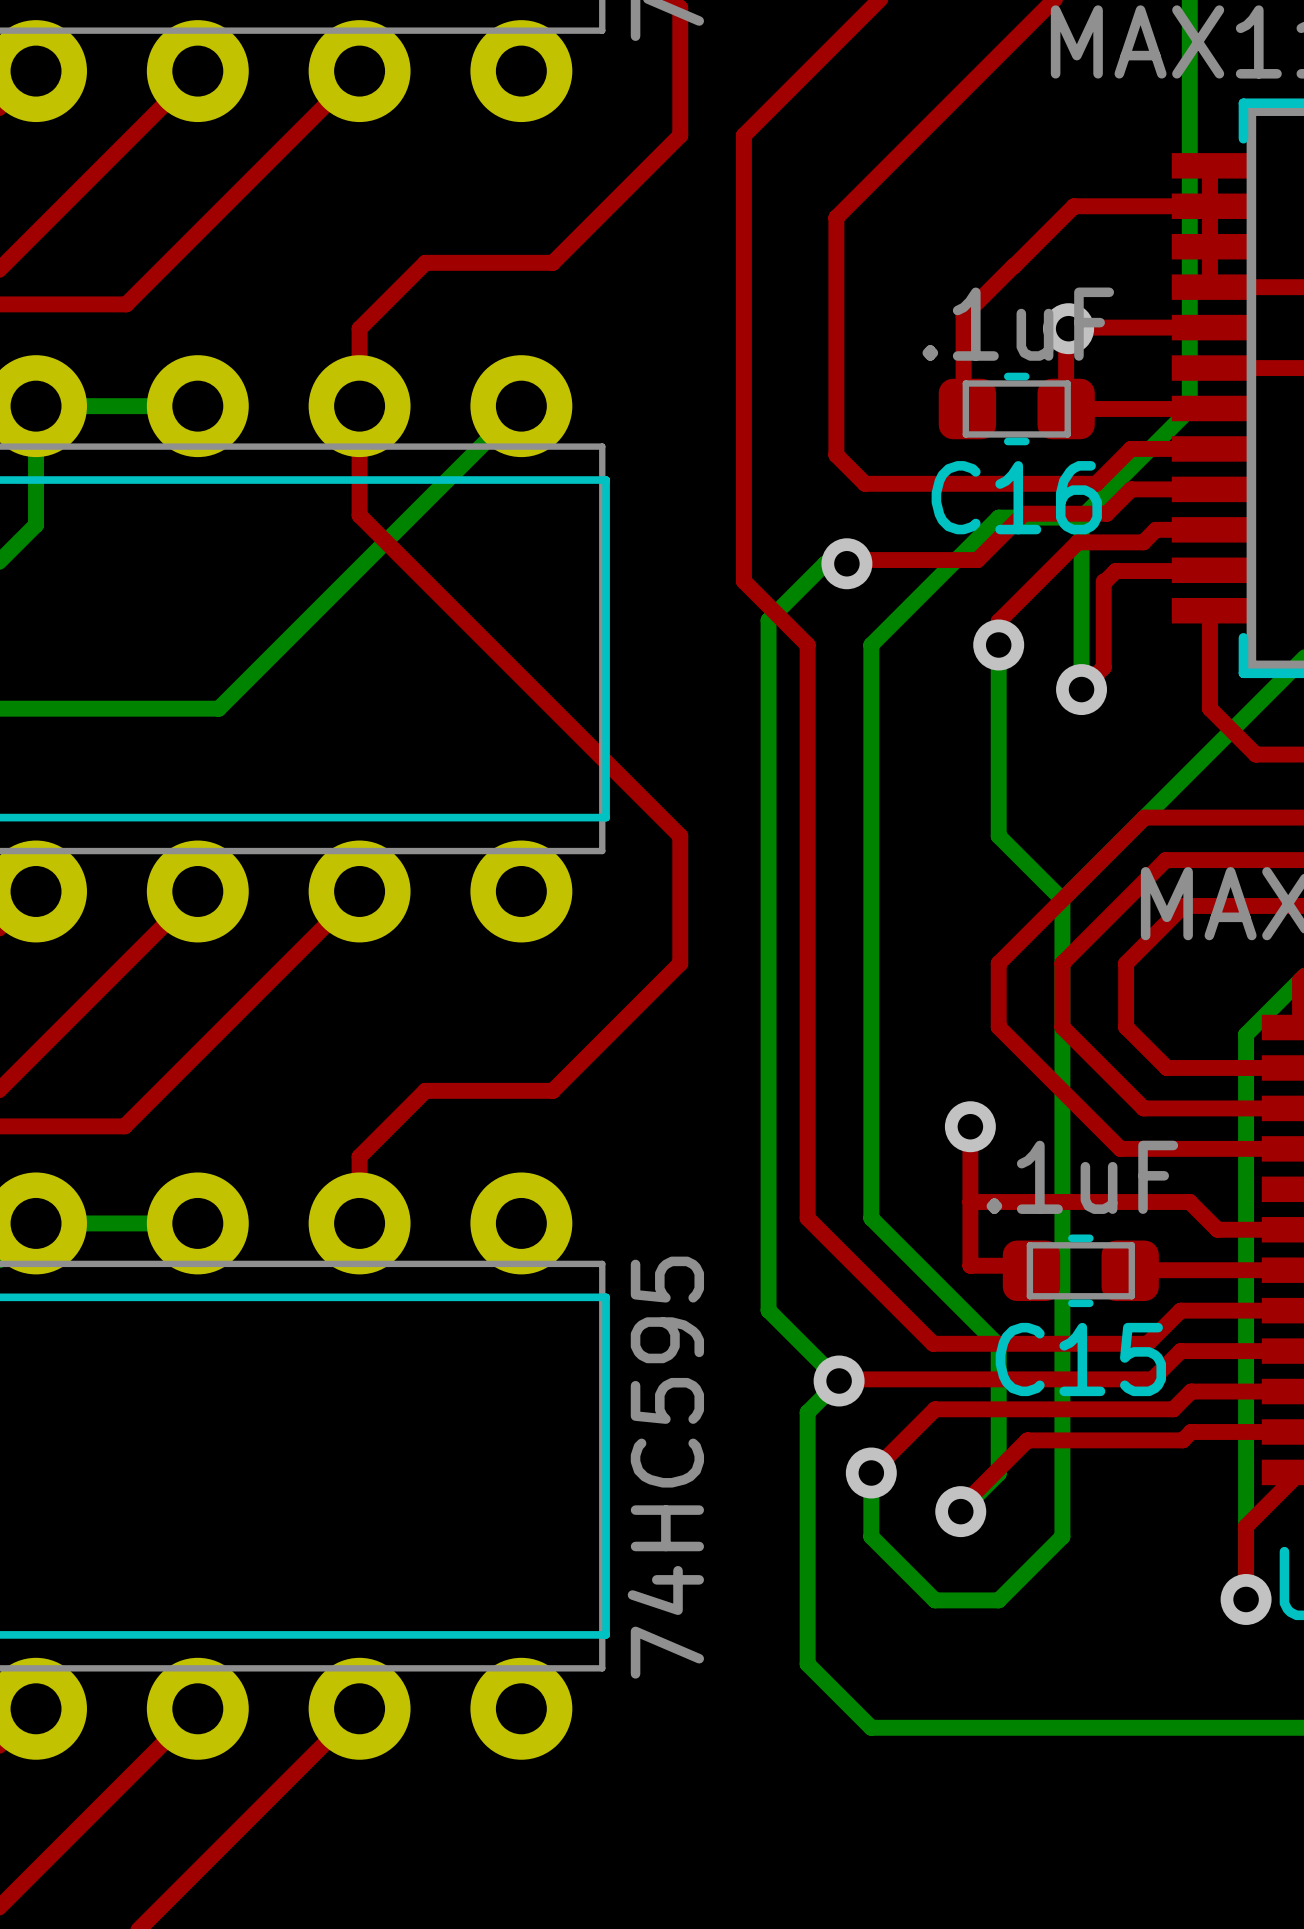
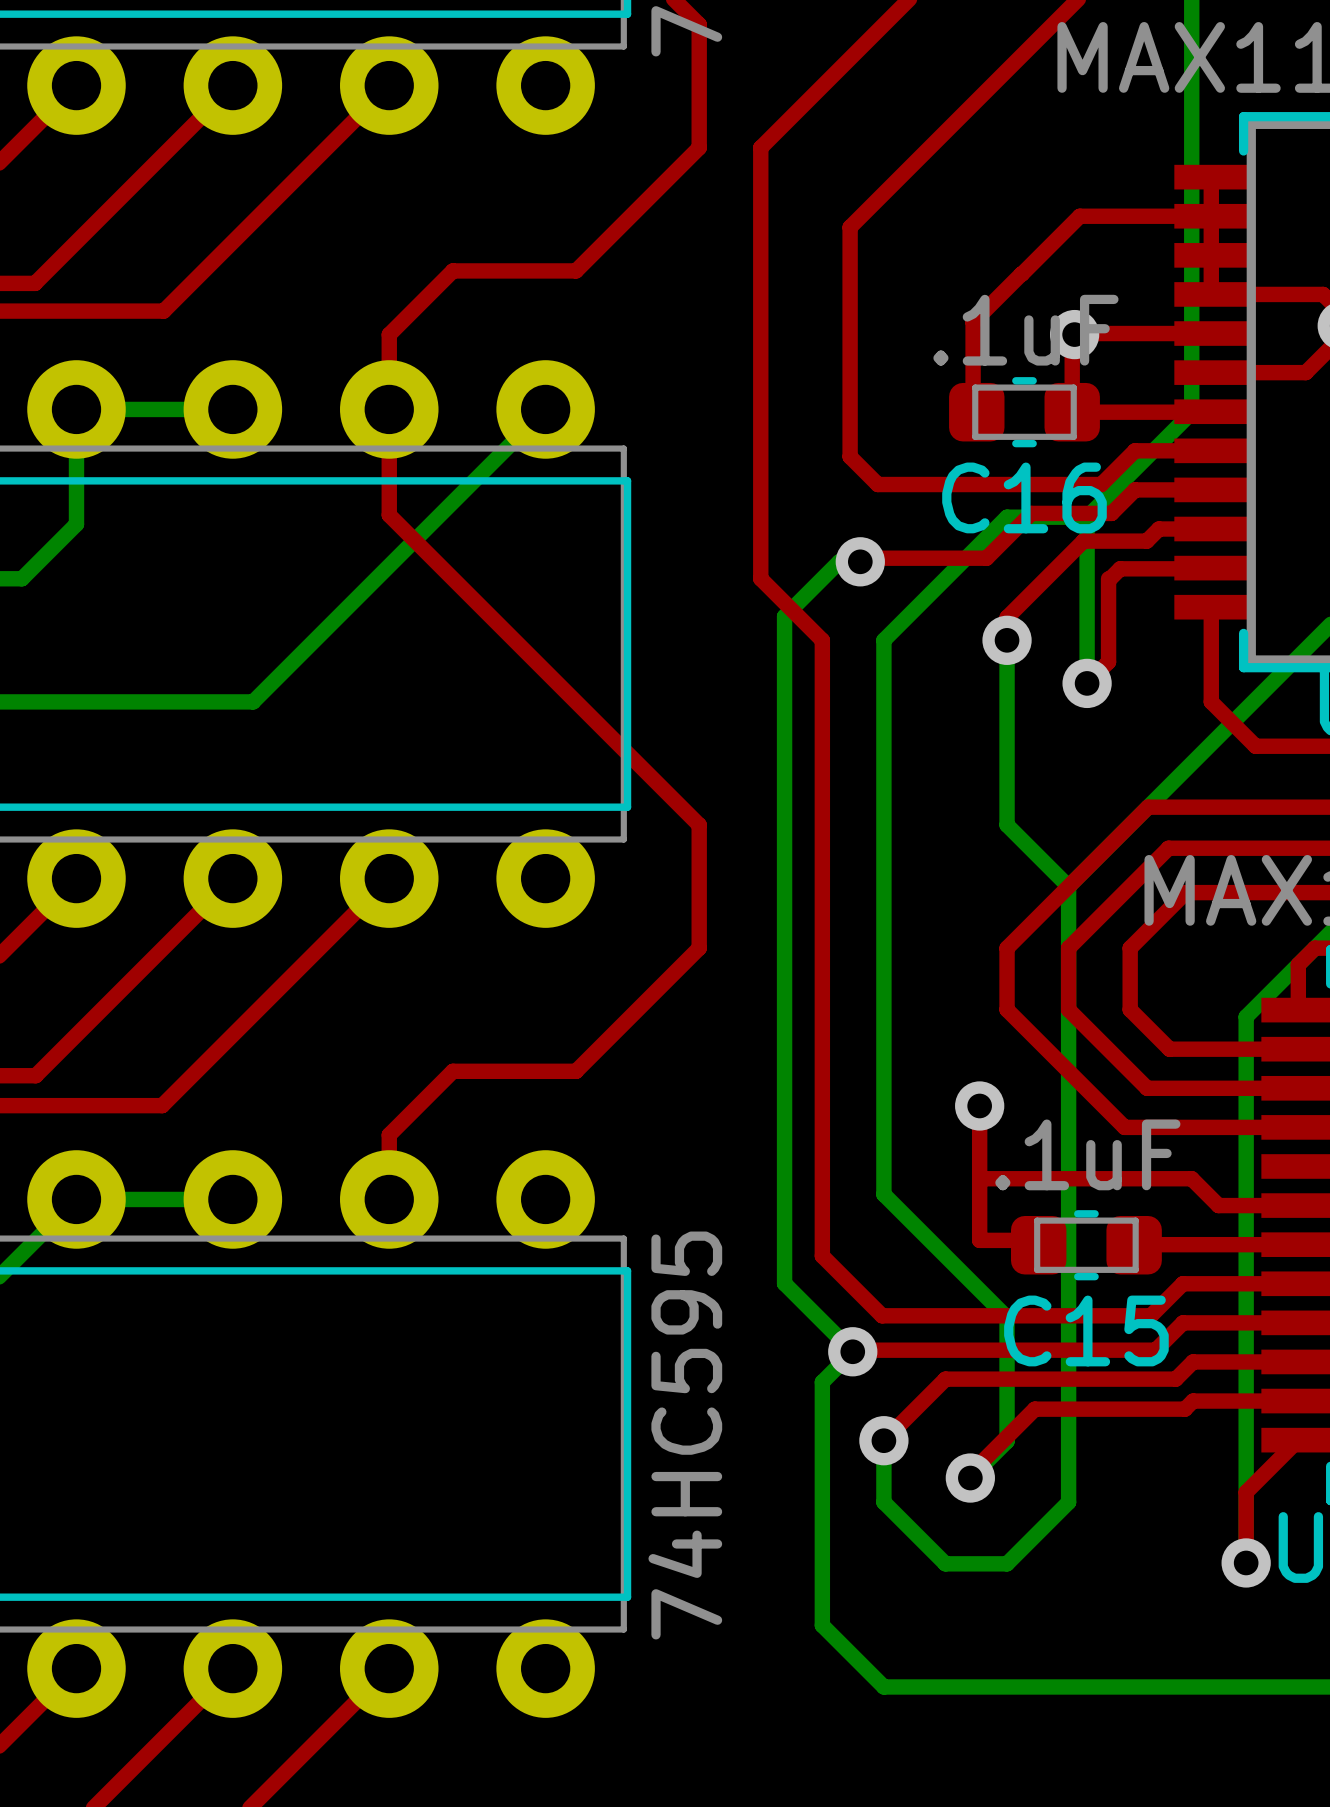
top track: (807, 1218) (933, 1343) -> (822, 1194) (822, 1256) (882, 1315) (943, 1315)

